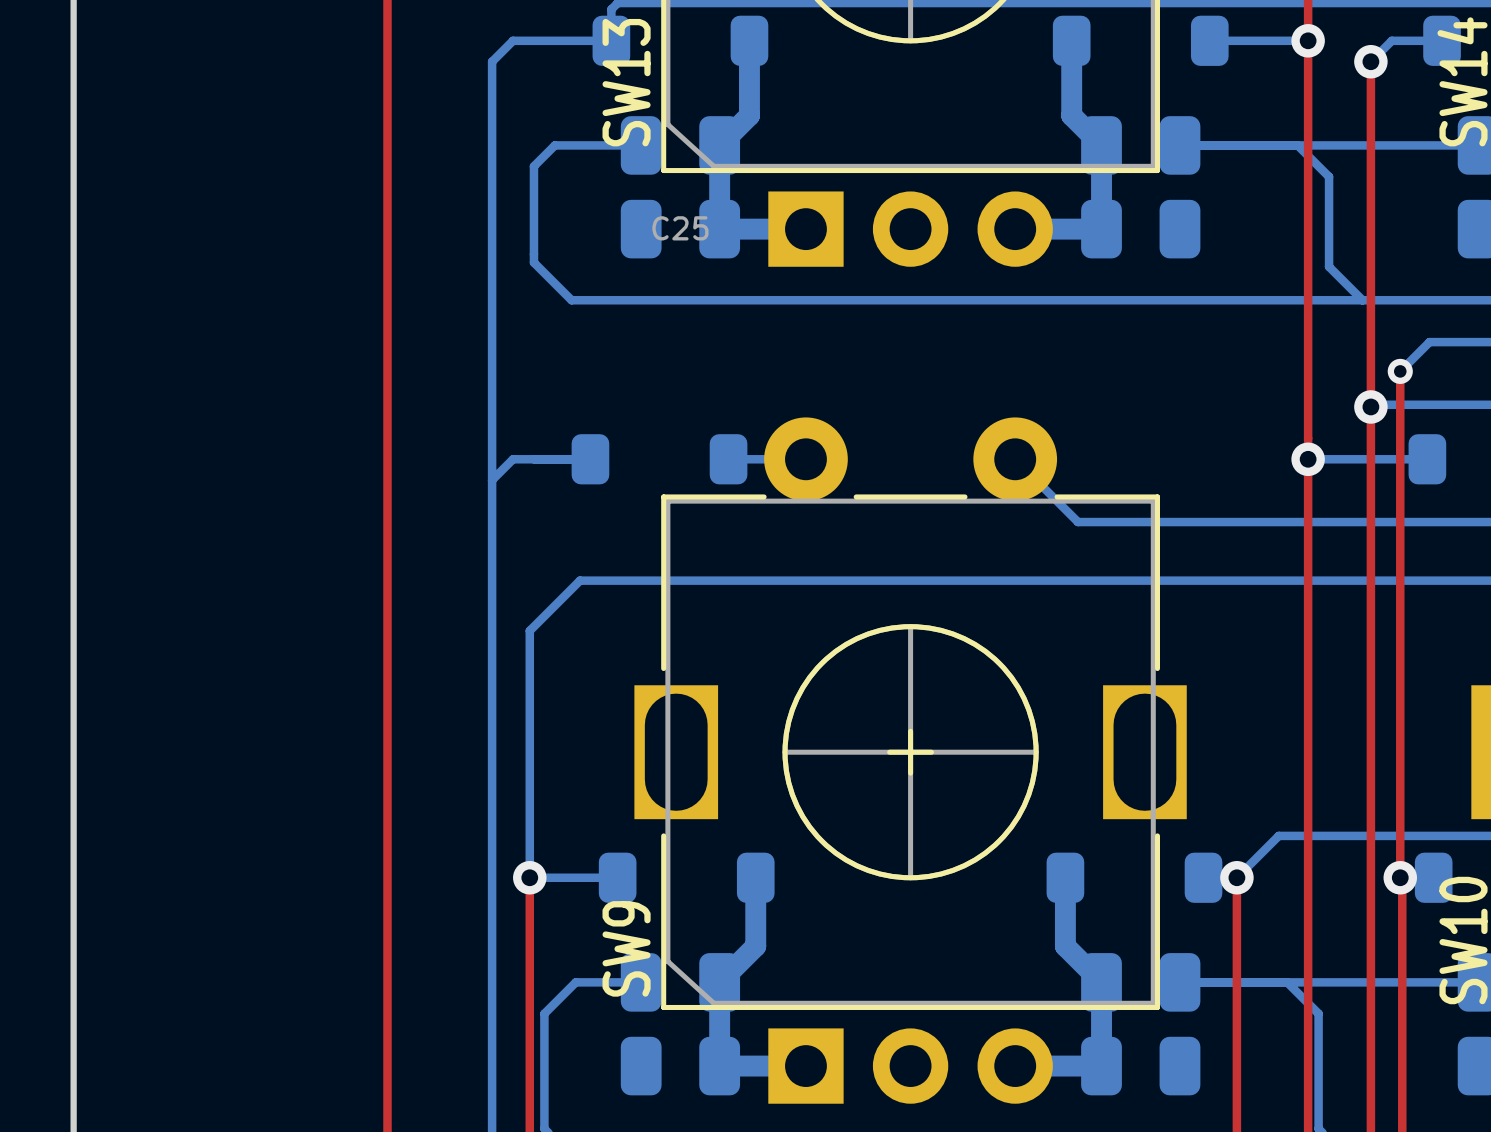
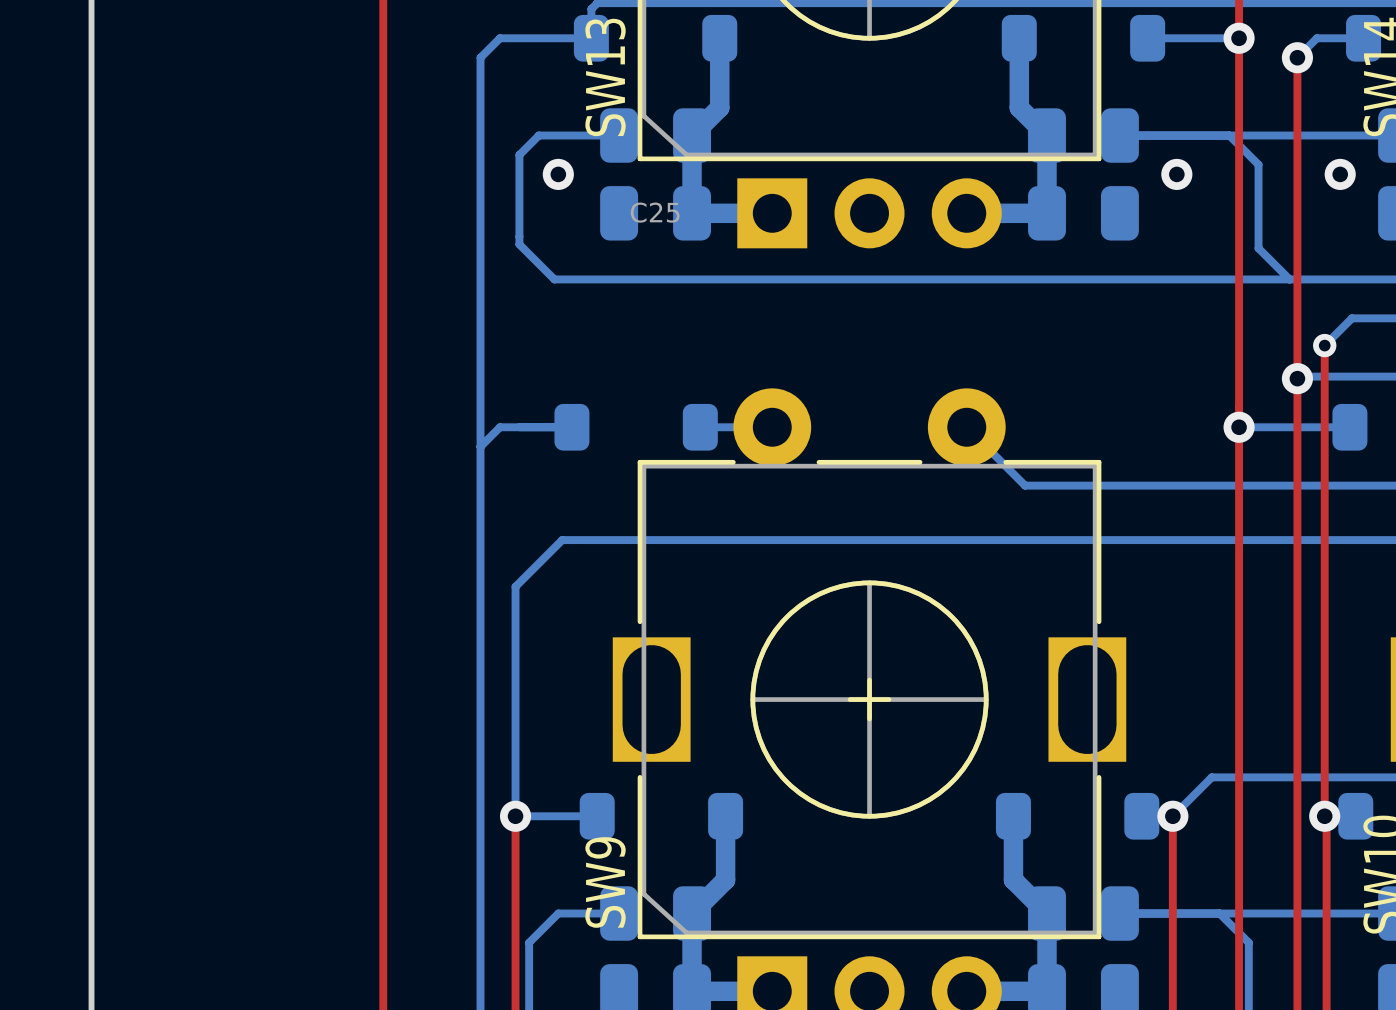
via: none -> (558, 174)
via: none -> (1176, 174)
via: none -> (1340, 174)

